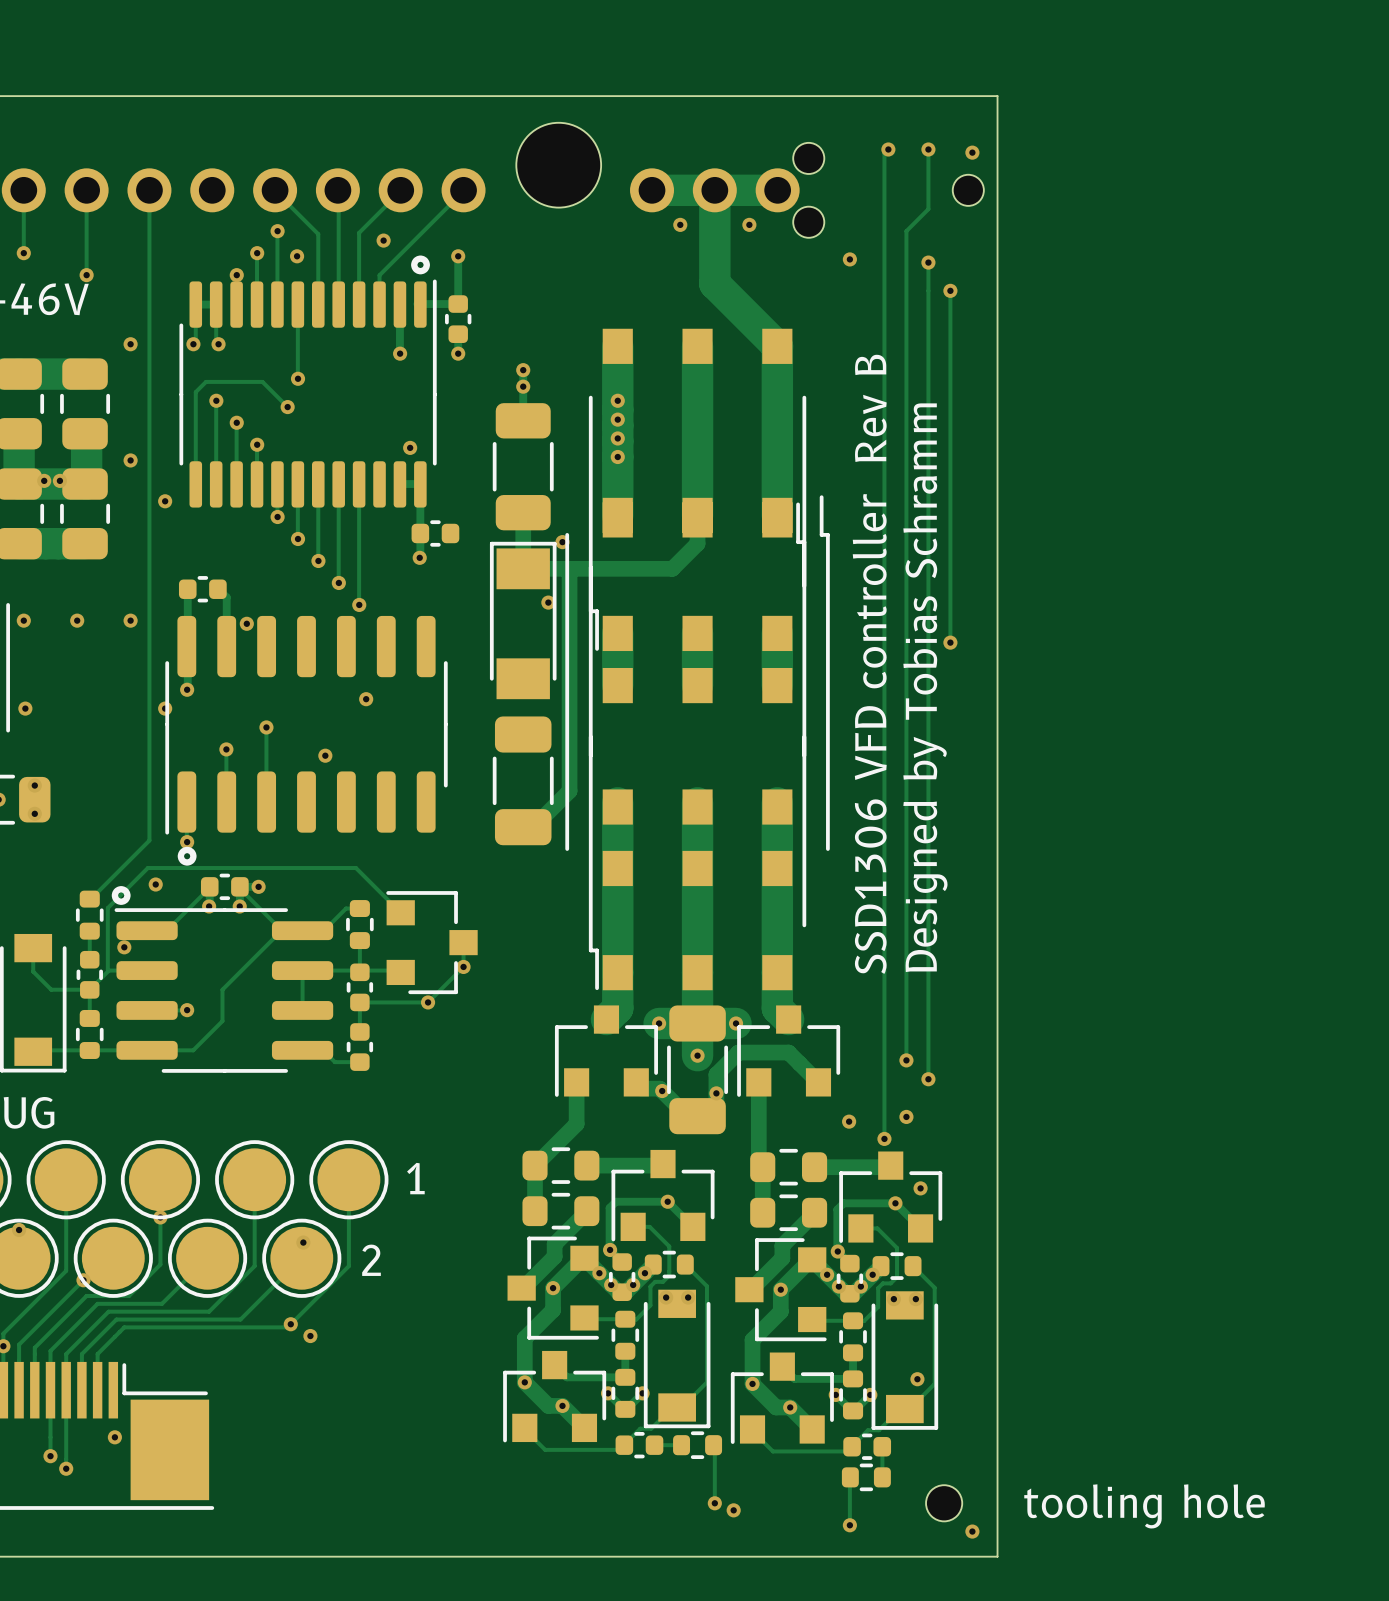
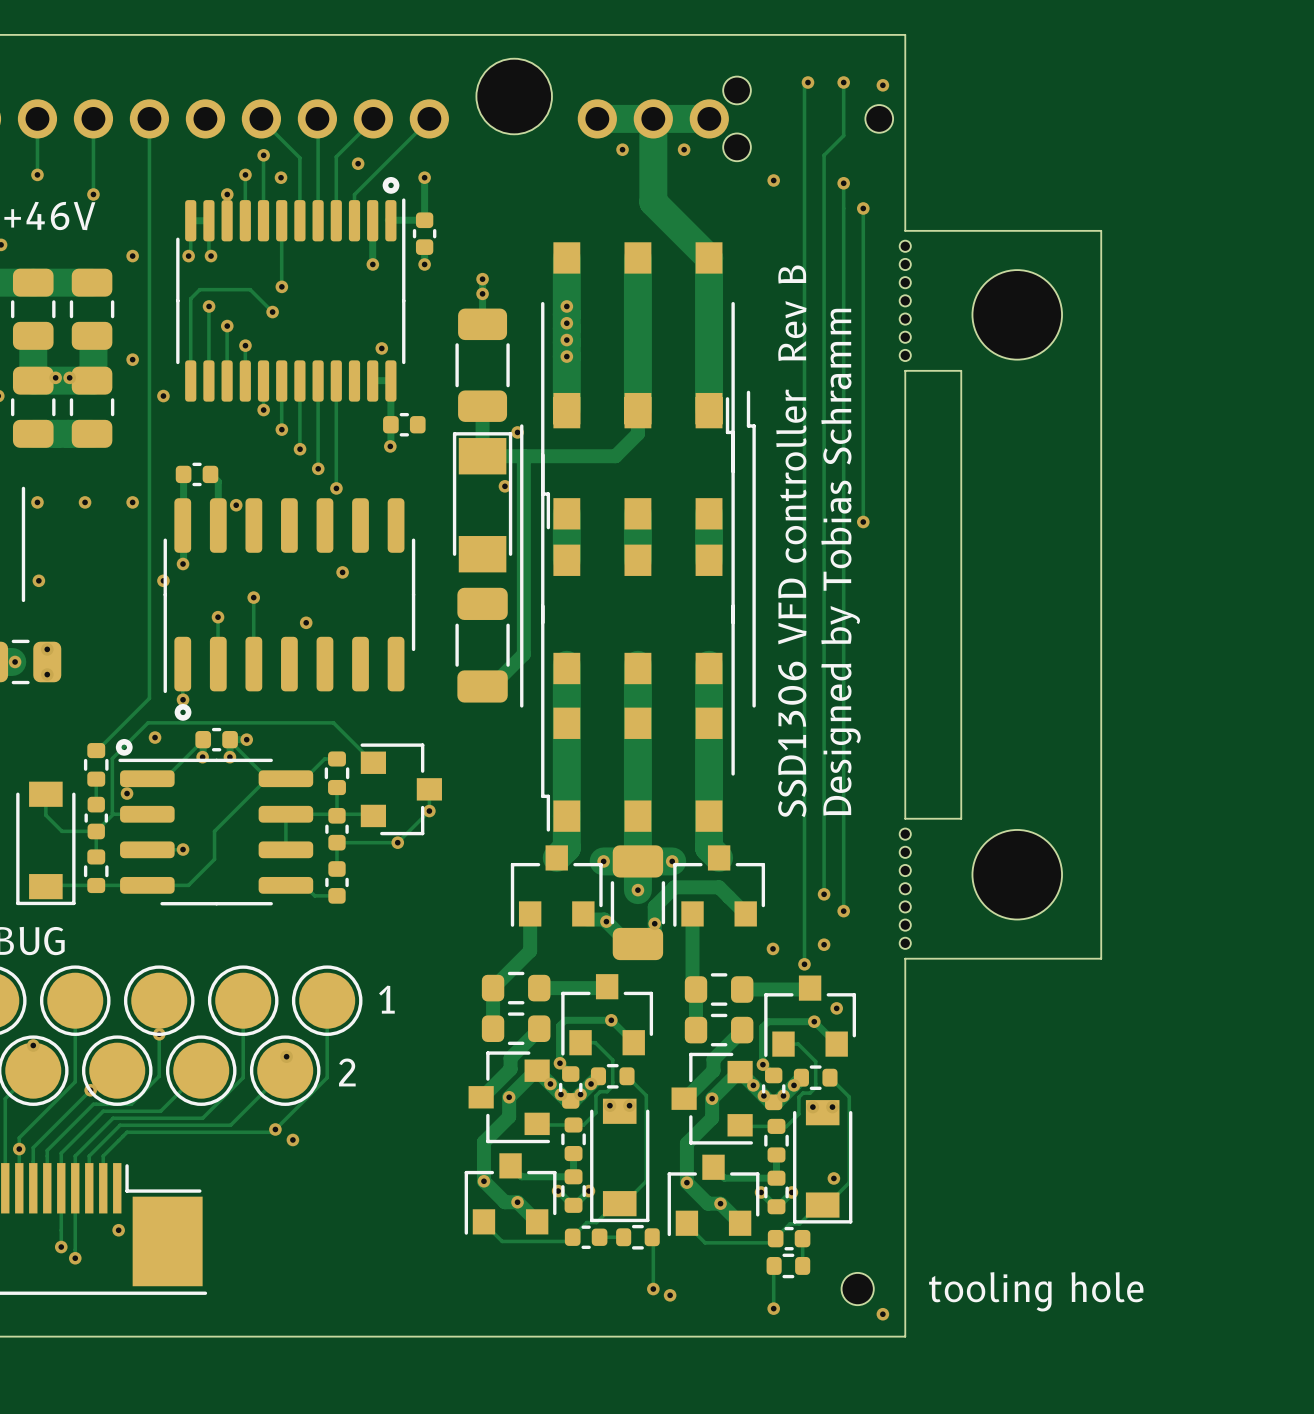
board edge: (997, 315) (997, 473) -> (905, 230) (1101, 230) (1101, 958) (905, 958)
part: none -> (905, 246)
part: none -> (905, 264)
part: none -> (905, 282)
part: none -> (905, 300)
part: none -> (1017, 314)
part: none -> (905, 319)
part: none -> (905, 337)
part: none -> (905, 355)
board edge: (997, 975) (997, 1132) -> (905, 818) (961, 818) (961, 370) (905, 370)
part: none -> (905, 834)
part: none -> (905, 852)
part: none -> (905, 870)
part: none -> (1017, 874)
part: none -> (905, 888)
part: none -> (905, 906)
part: none -> (905, 925)
part: none -> (905, 943)

